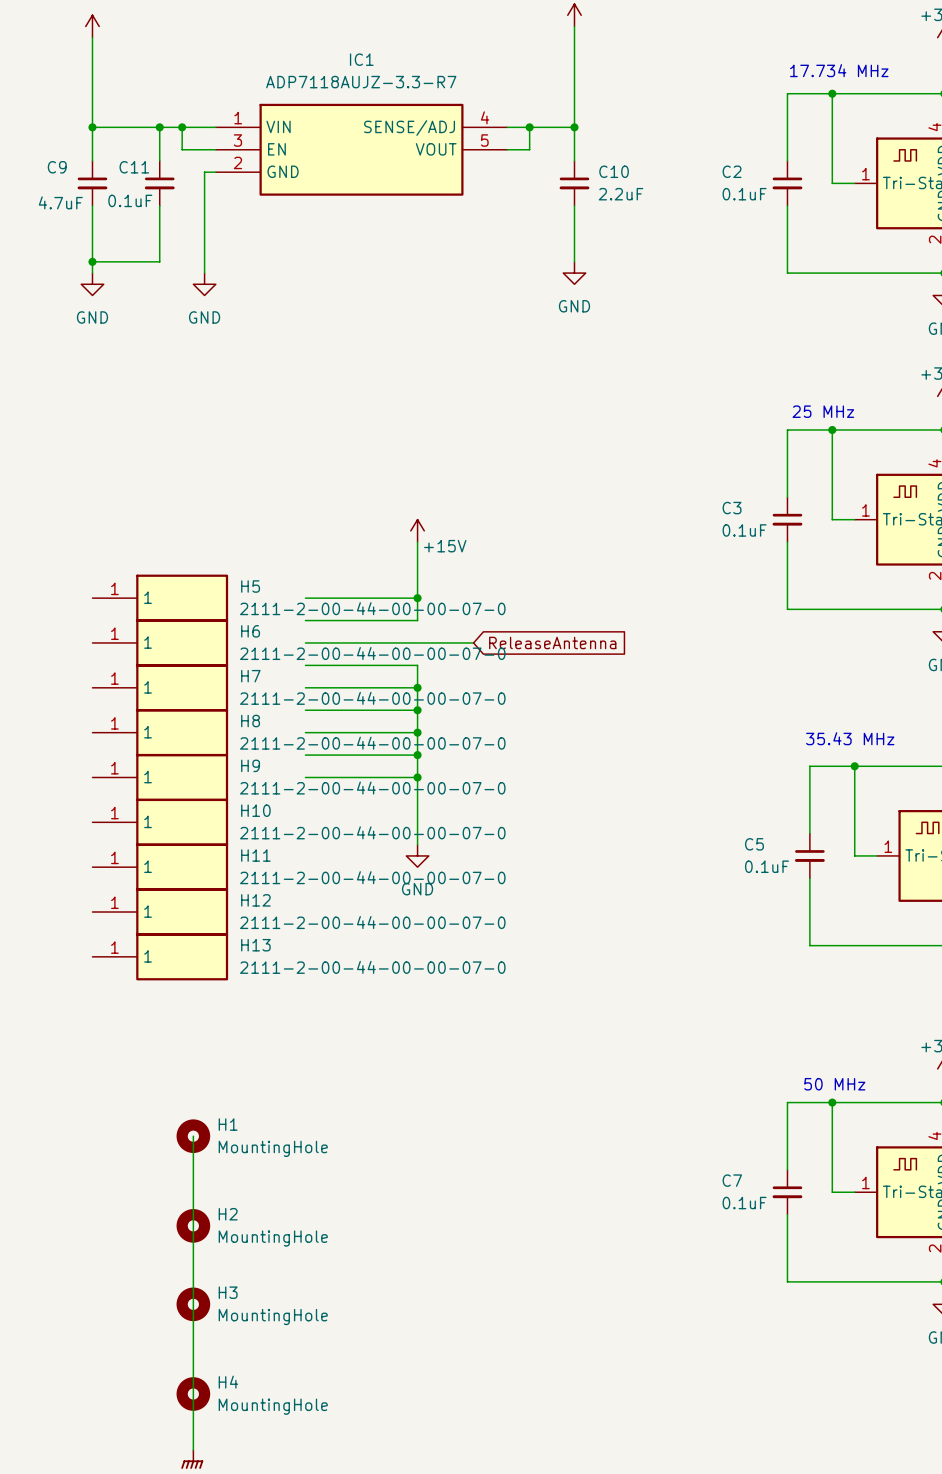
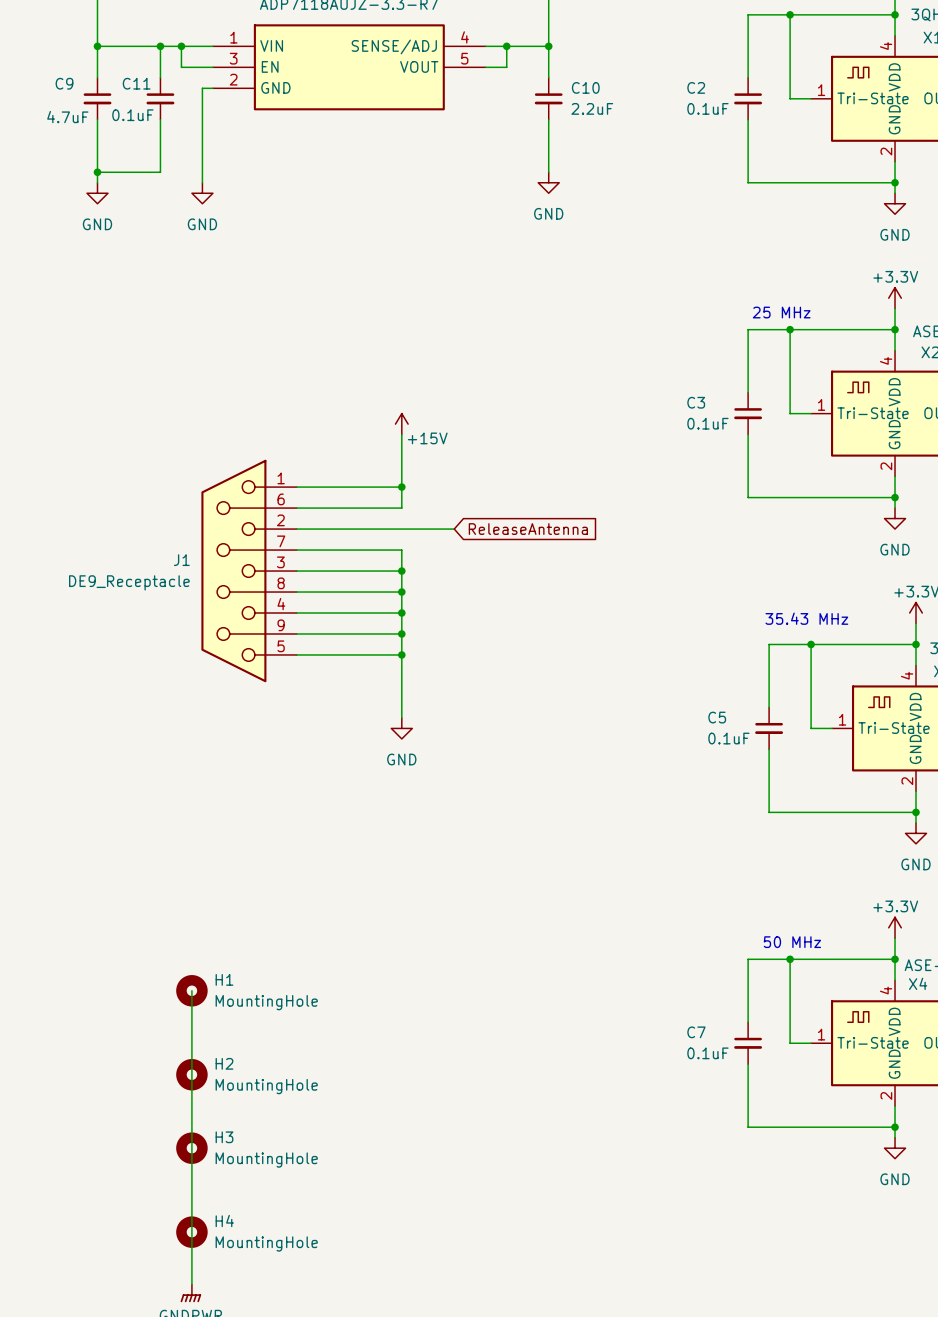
H5: 2111-2-00-44-00-00-07-0 (160, 598) -> none
H6: 2111-2-00-44-00-00-07-0 (160, 642) -> none
H7: 2111-2-00-44-00-00-07-0 (160, 687) -> none
J1: none -> DE9_Receptacle (249, 571)
H8: 2111-2-00-44-00-00-07-0 (160, 732) -> none
H9: 2111-2-00-44-00-00-07-0 (160, 777) -> none
H10: 2111-2-00-44-00-00-07-0 (160, 822) -> none
H11: 2111-2-00-44-00-00-07-0 (160, 867) -> none
H12: 2111-2-00-44-00-00-07-0 (160, 912) -> none
H13: 2111-2-00-44-00-00-07-0 (160, 956) -> none

